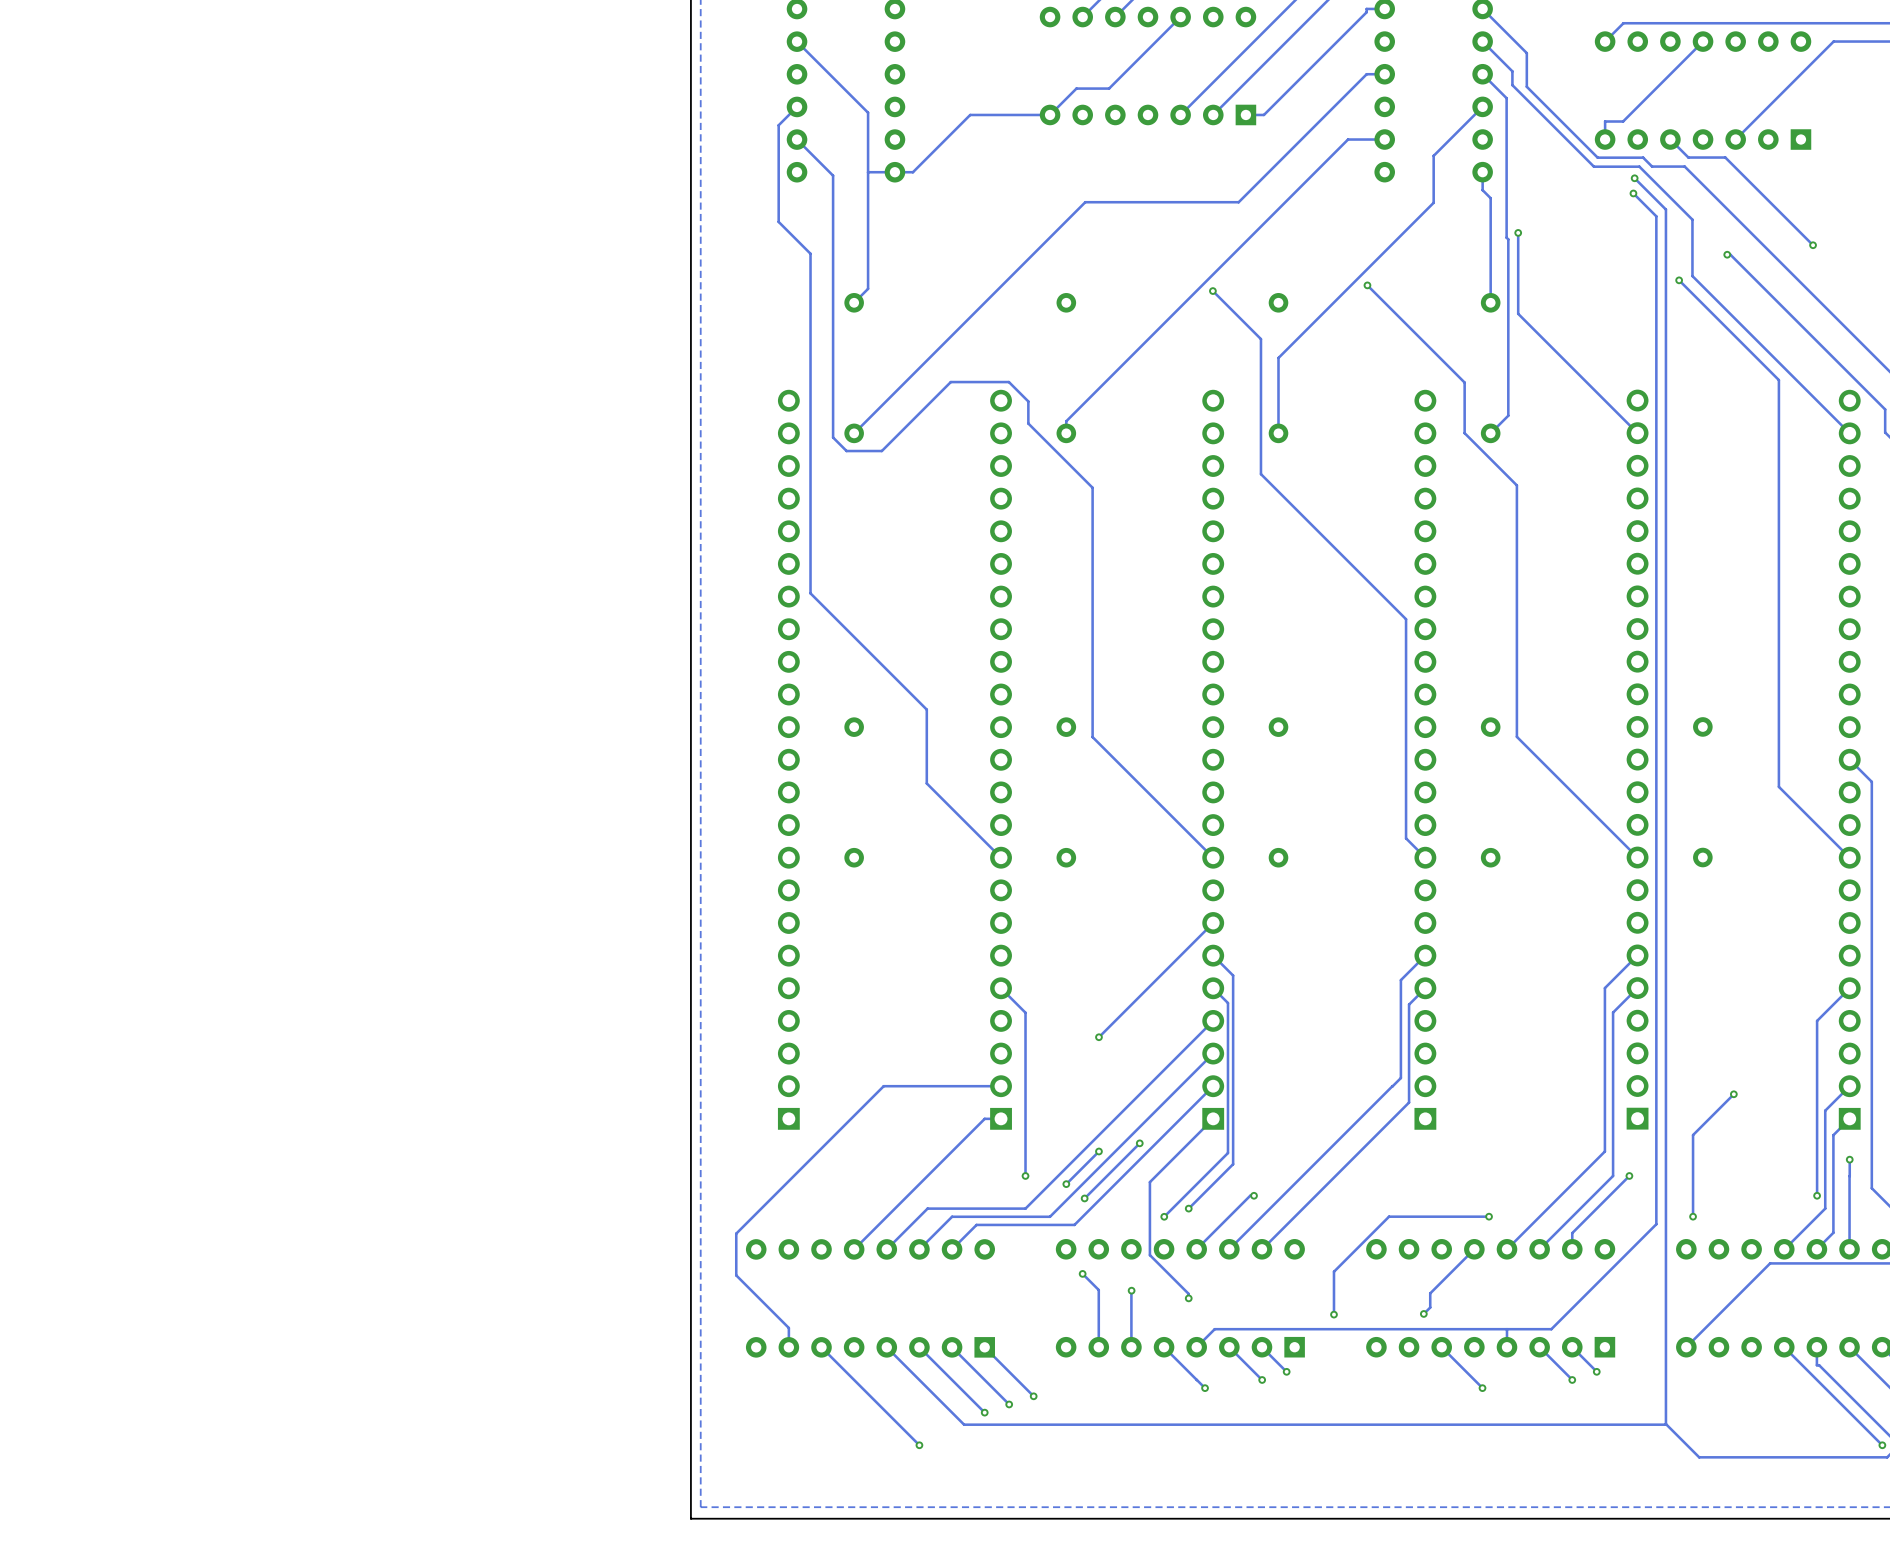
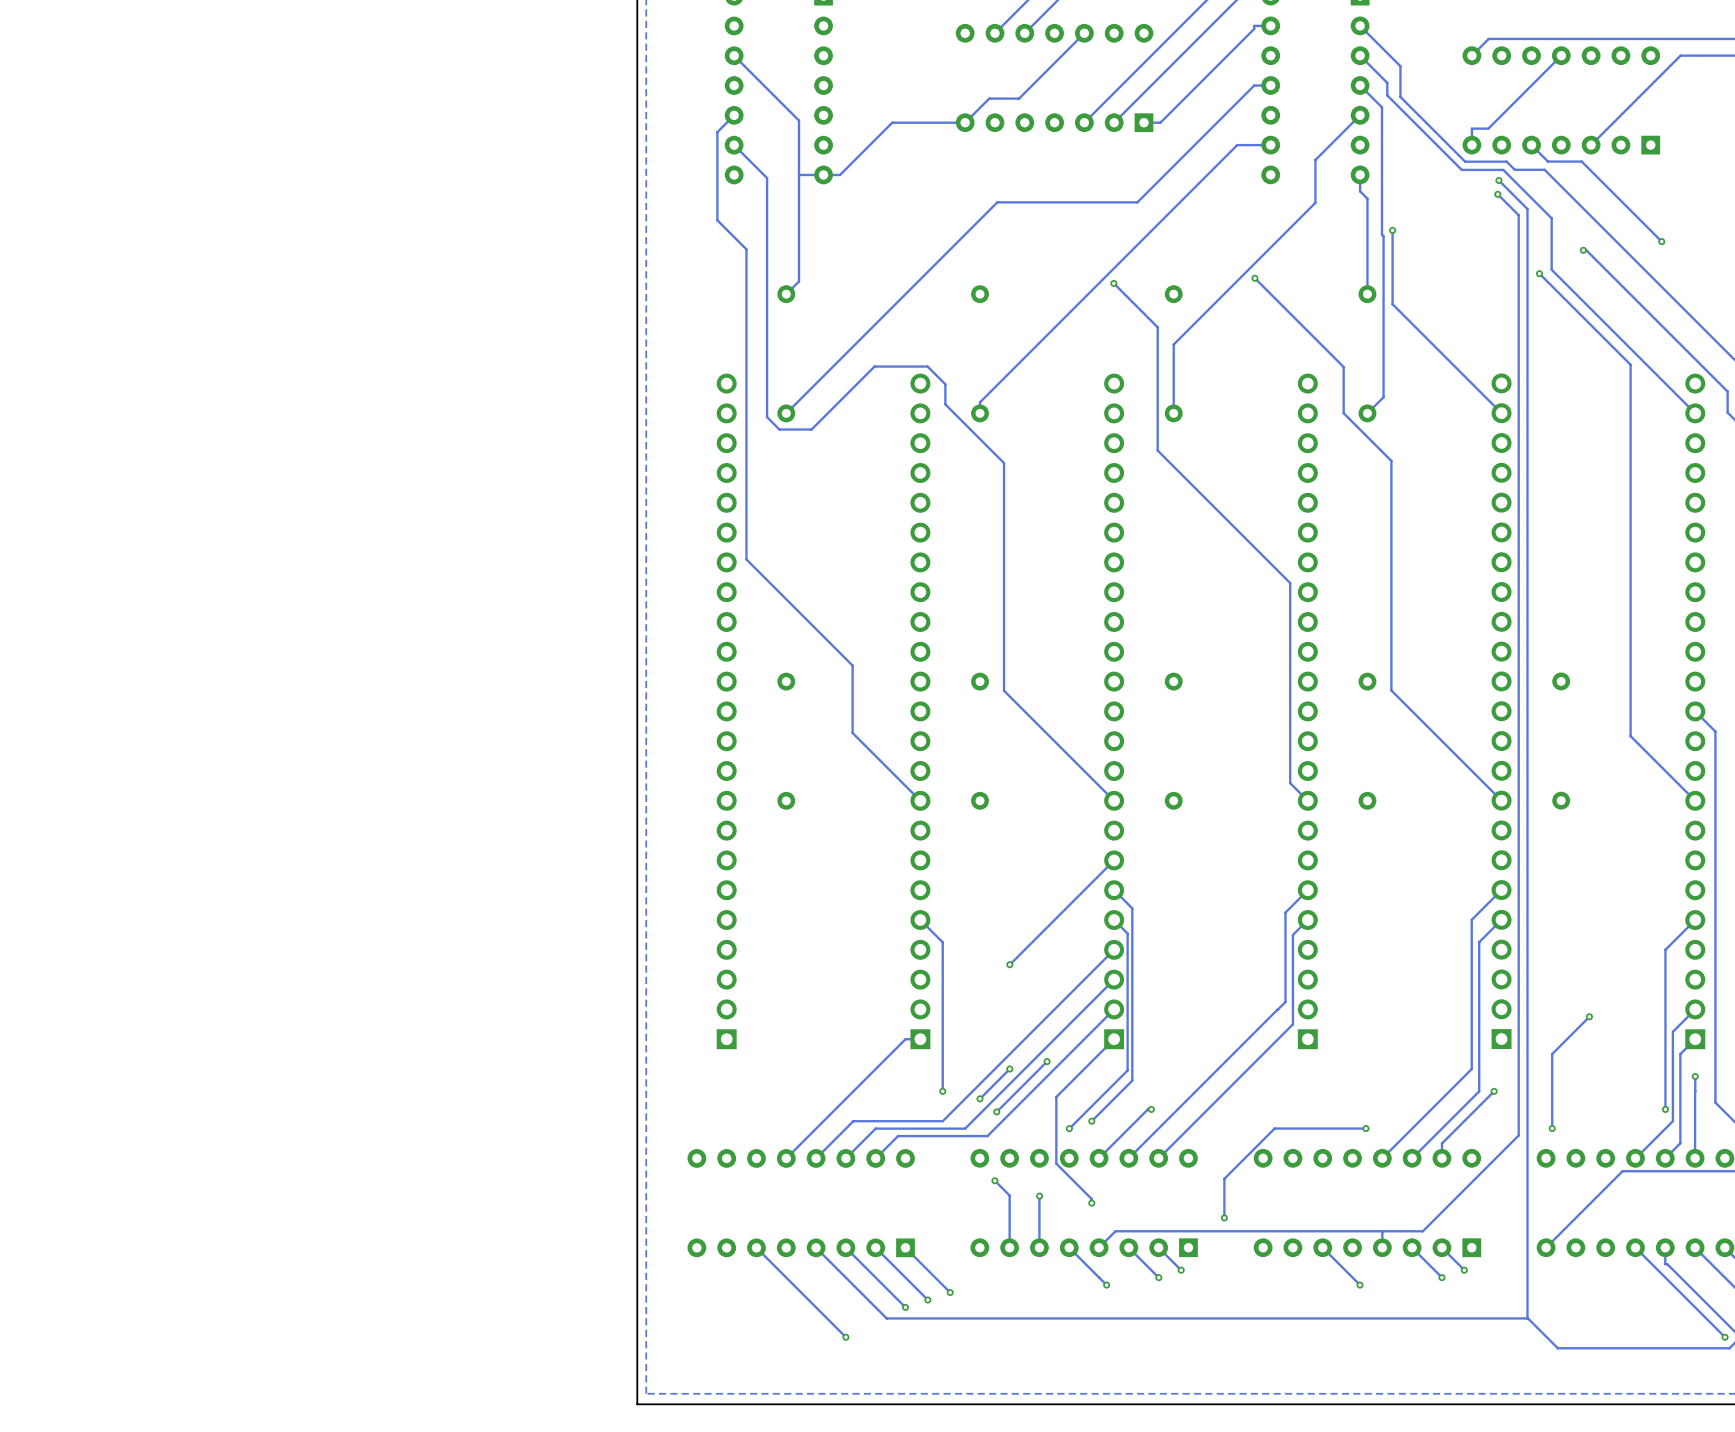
track: (1001, 1086) (883, 1086) (736, 1233) (736, 1275) (788, 1327) (788, 1347) -> none
track: (1474, 1249) (1430, 1293) (1430, 1307) (1423, 1313) -> none
via: (1423, 1313) -> none

